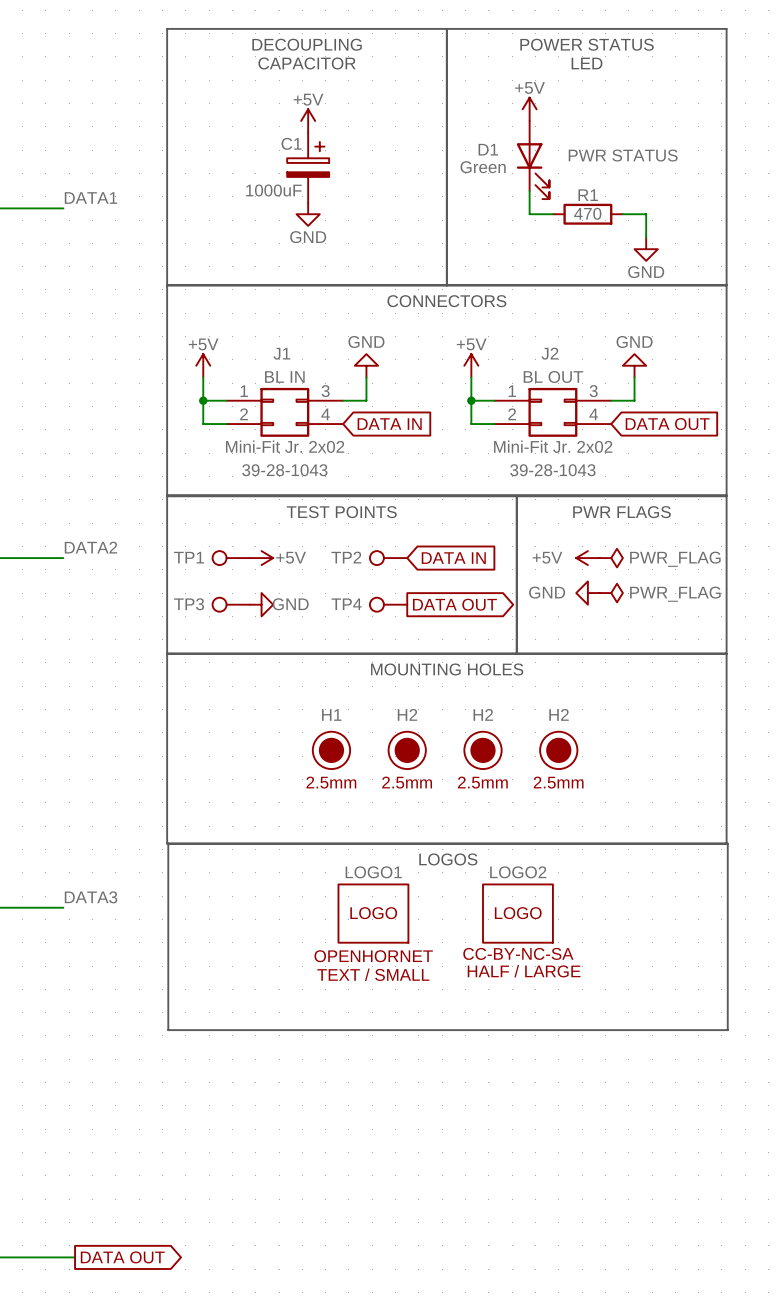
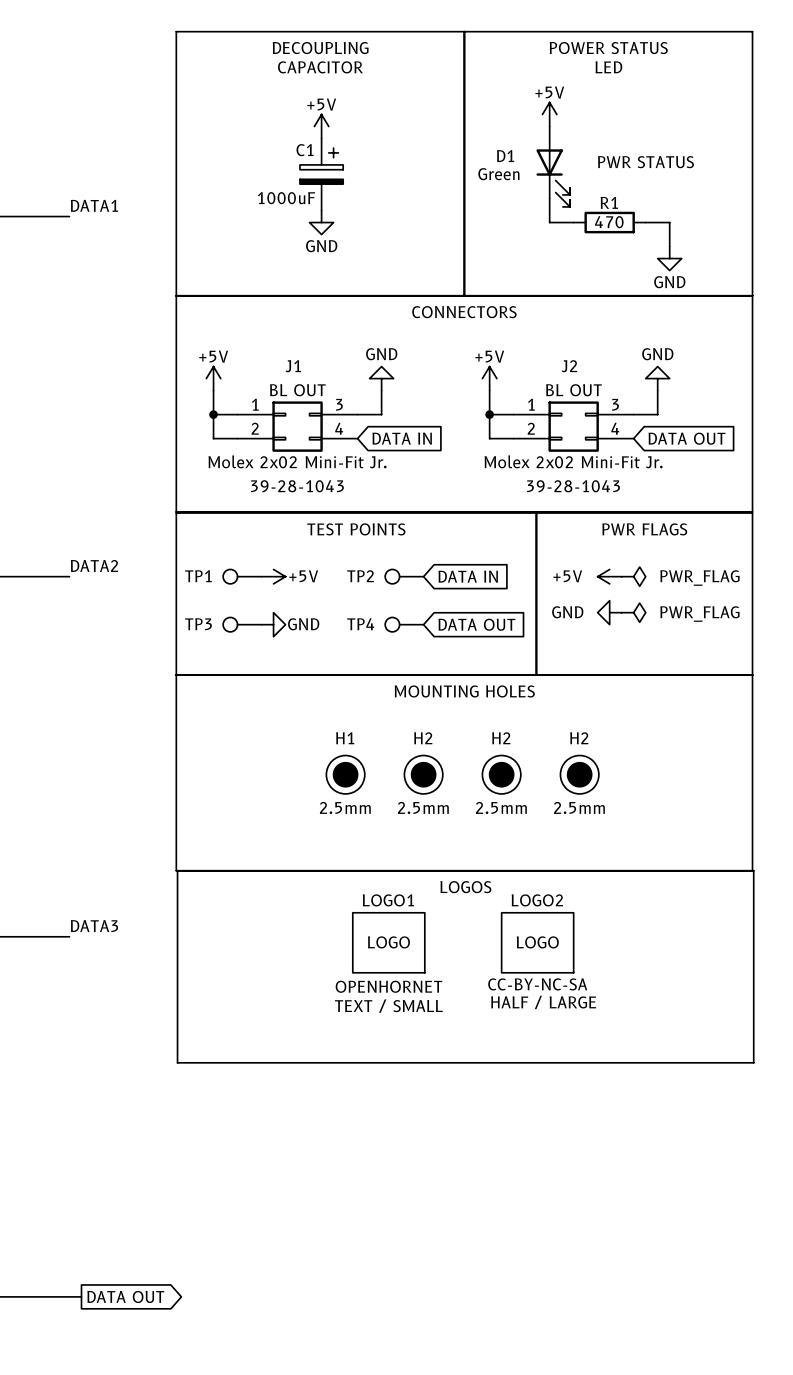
J1 text: BL IN (284, 376) -> BL OUT (297, 390)
J1 value: Mini-Fit Jr. 2x02 (285, 446) -> Molex 2x02 Mini-Fit Jr. (297, 461)
J2 value: Mini-Fit Jr. 2x02 (553, 446) -> Molex 2x02 Mini-Fit Jr. (573, 461)
global label shape: output (454, 604) -> input (476, 624)

